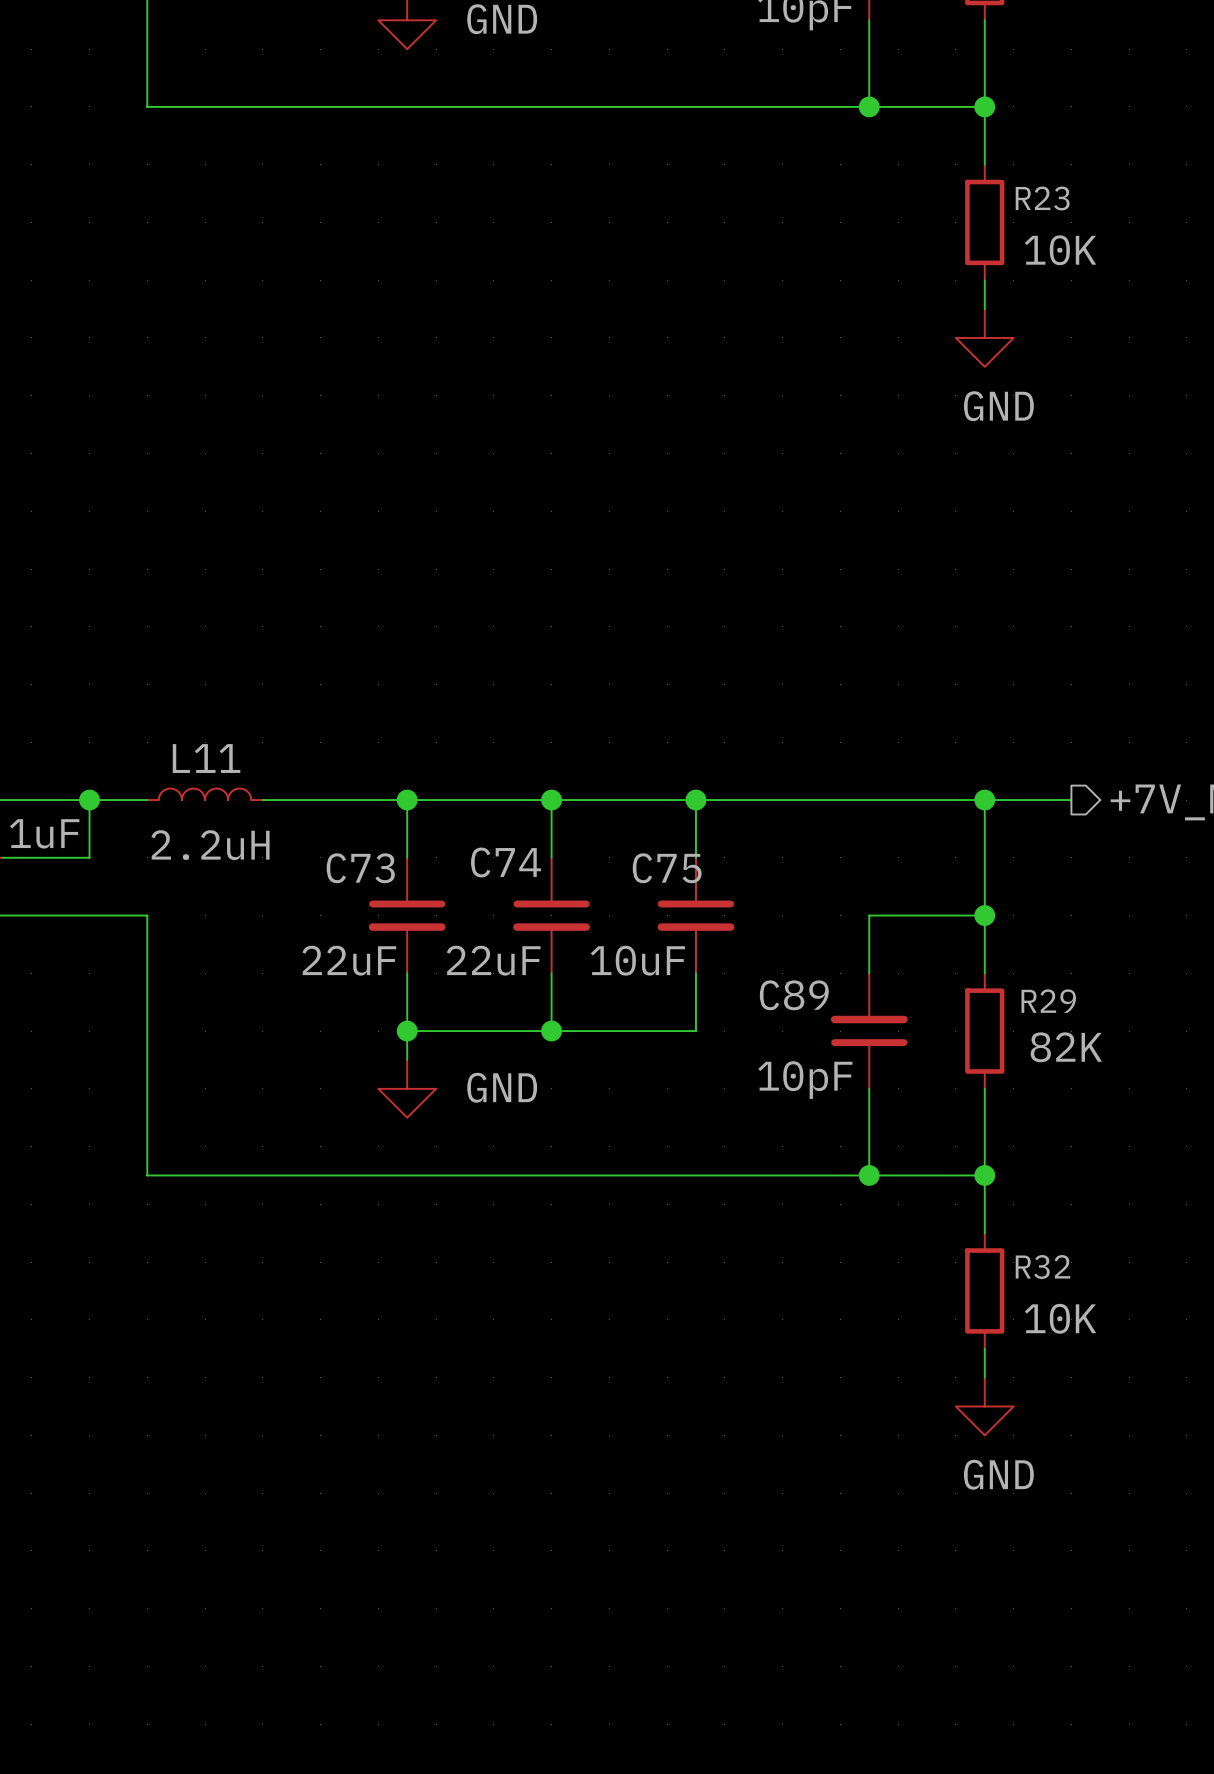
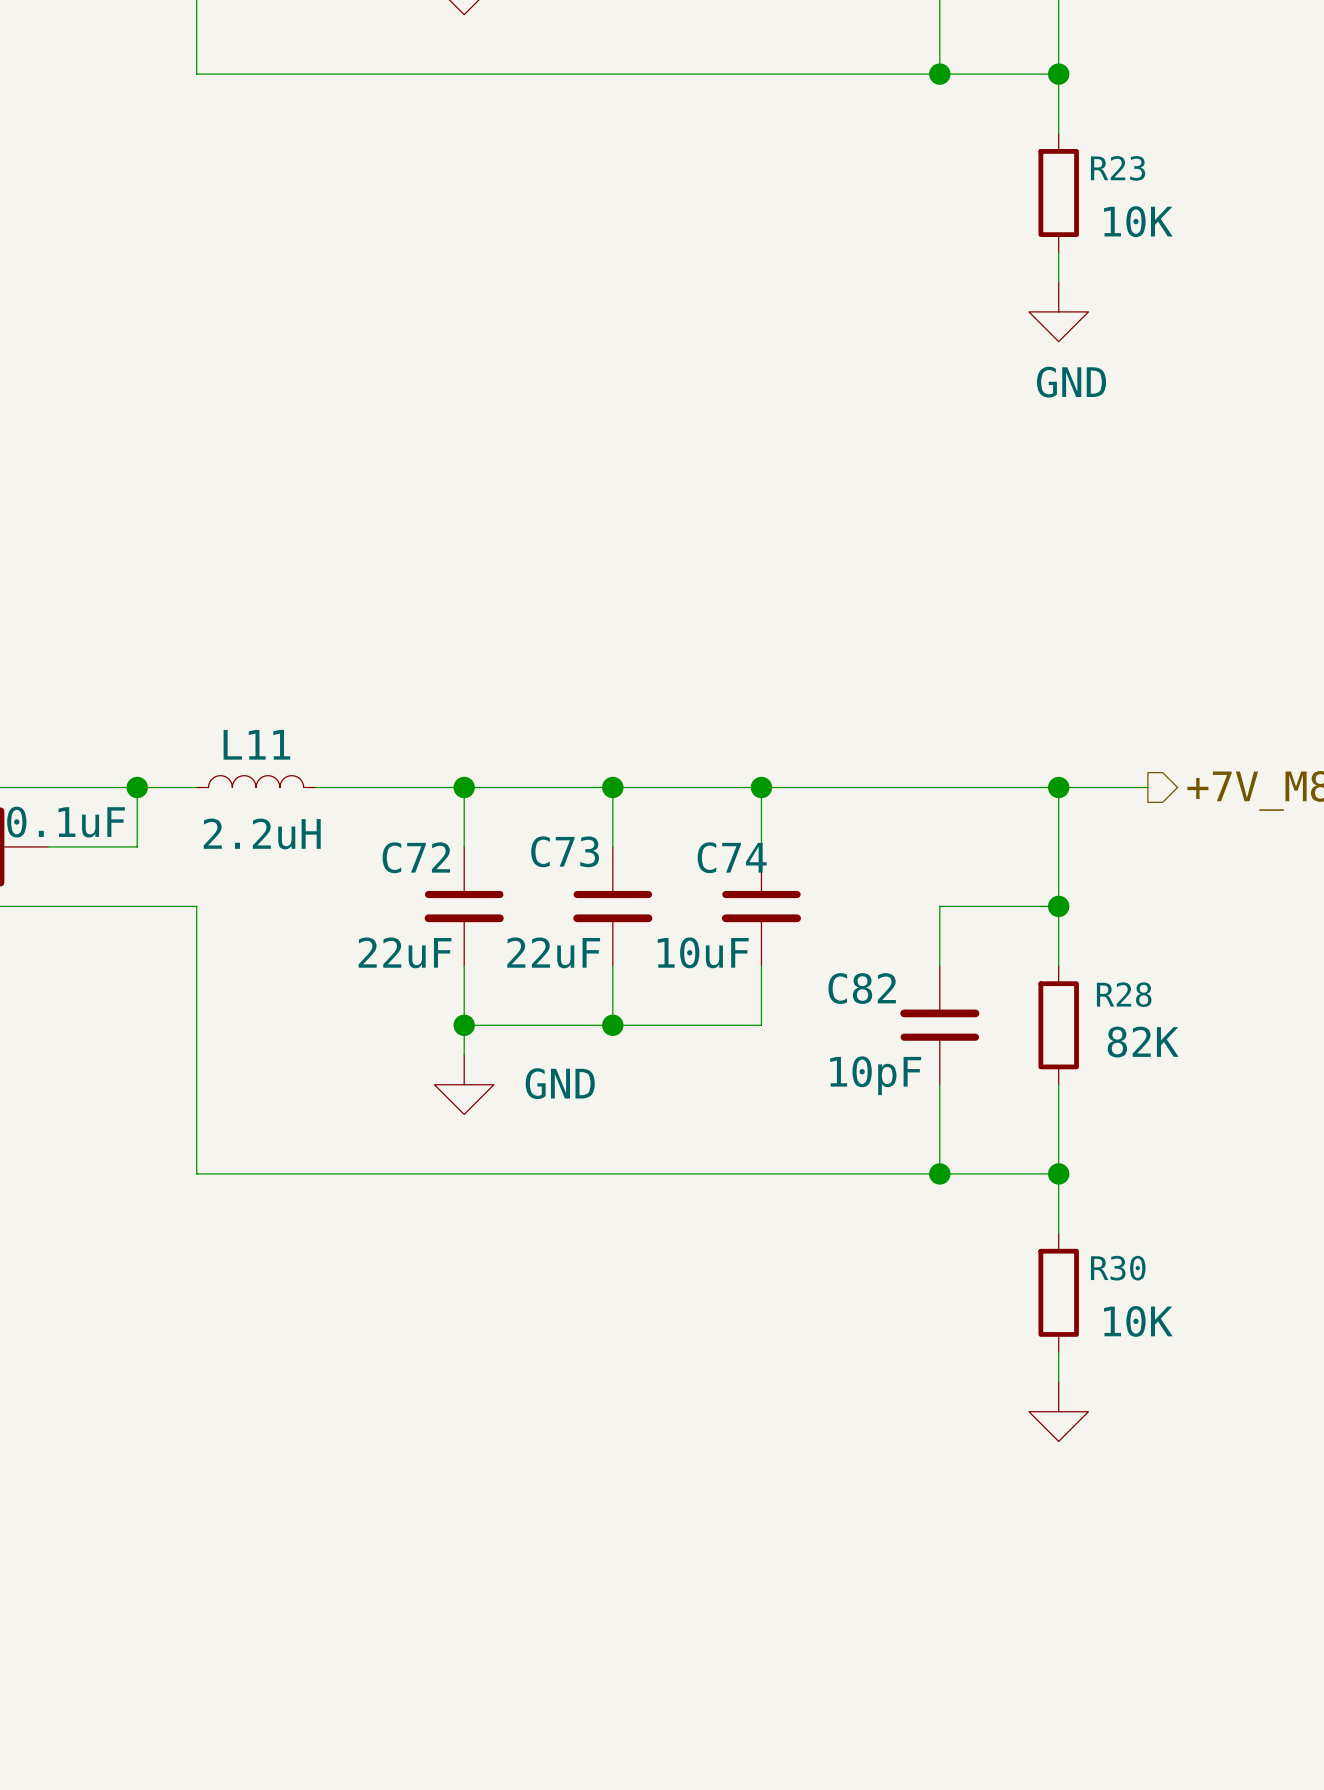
C74 name: C74 (506, 862) -> C73 (565, 851)
C73 name: C73 (360, 868) -> C72 (416, 857)
C75 name: C75 (667, 868) -> C74 (732, 857)
C89 name: C89 (794, 995) -> C82 (862, 988)
R29 name: R29 (1048, 1001) -> R28 (1124, 994)
R32 name: R32 (1042, 1267) -> R30 (1118, 1268)
power symbol text: GND (998, 1474) -> none

